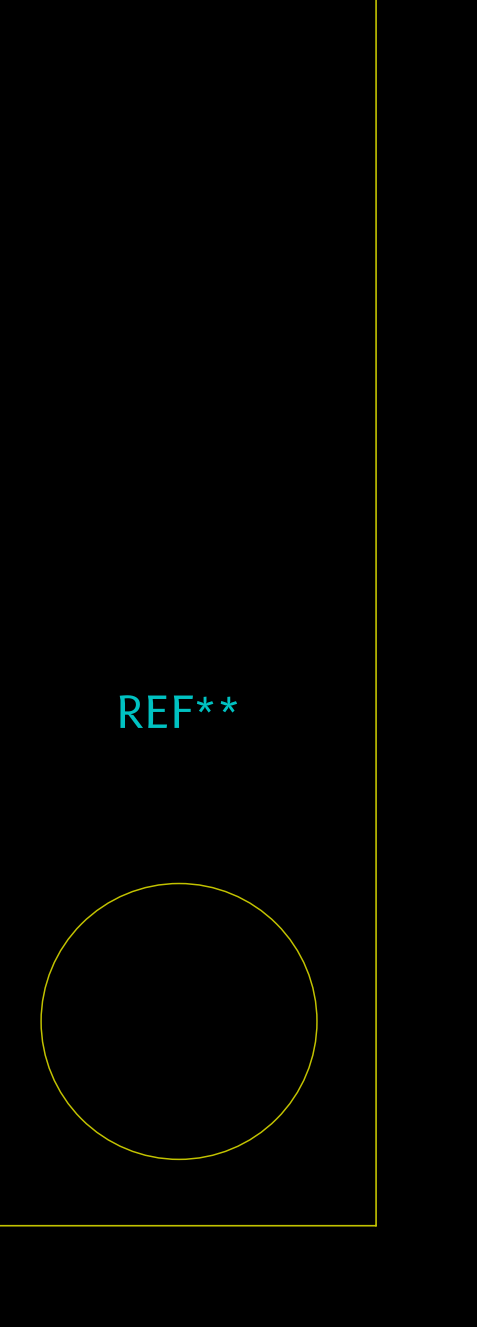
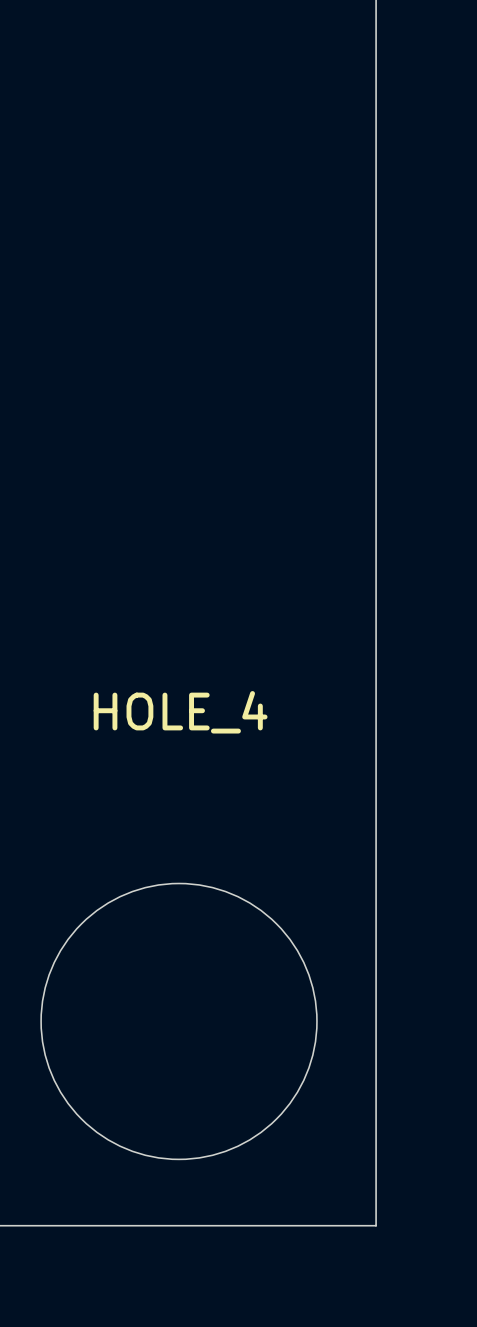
REF** name: REF** (178, 711) -> HOLE_4 (180, 712)

